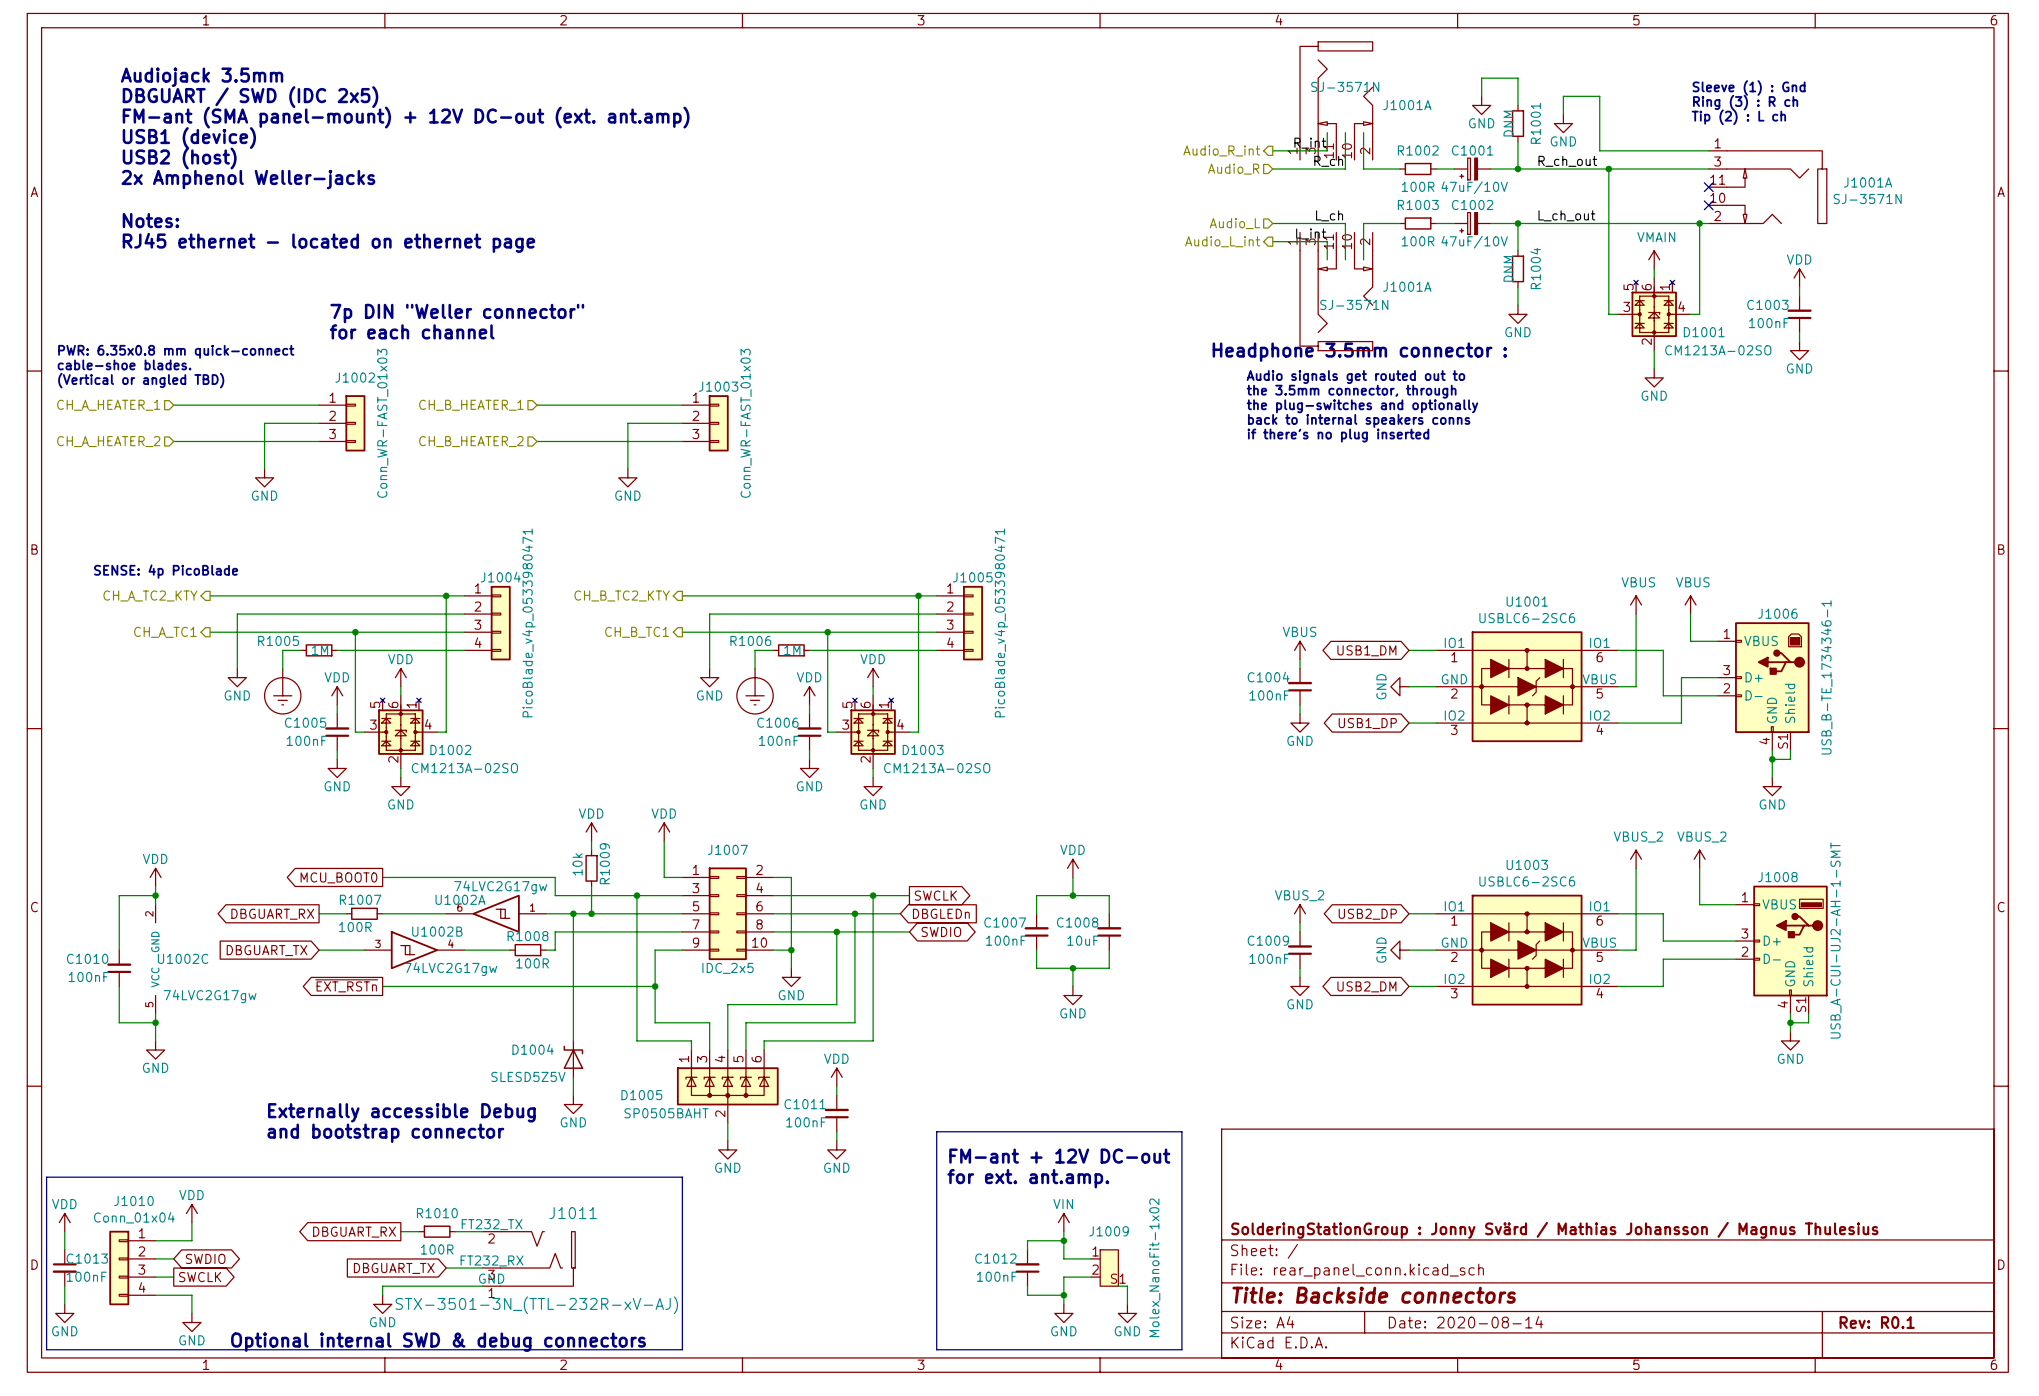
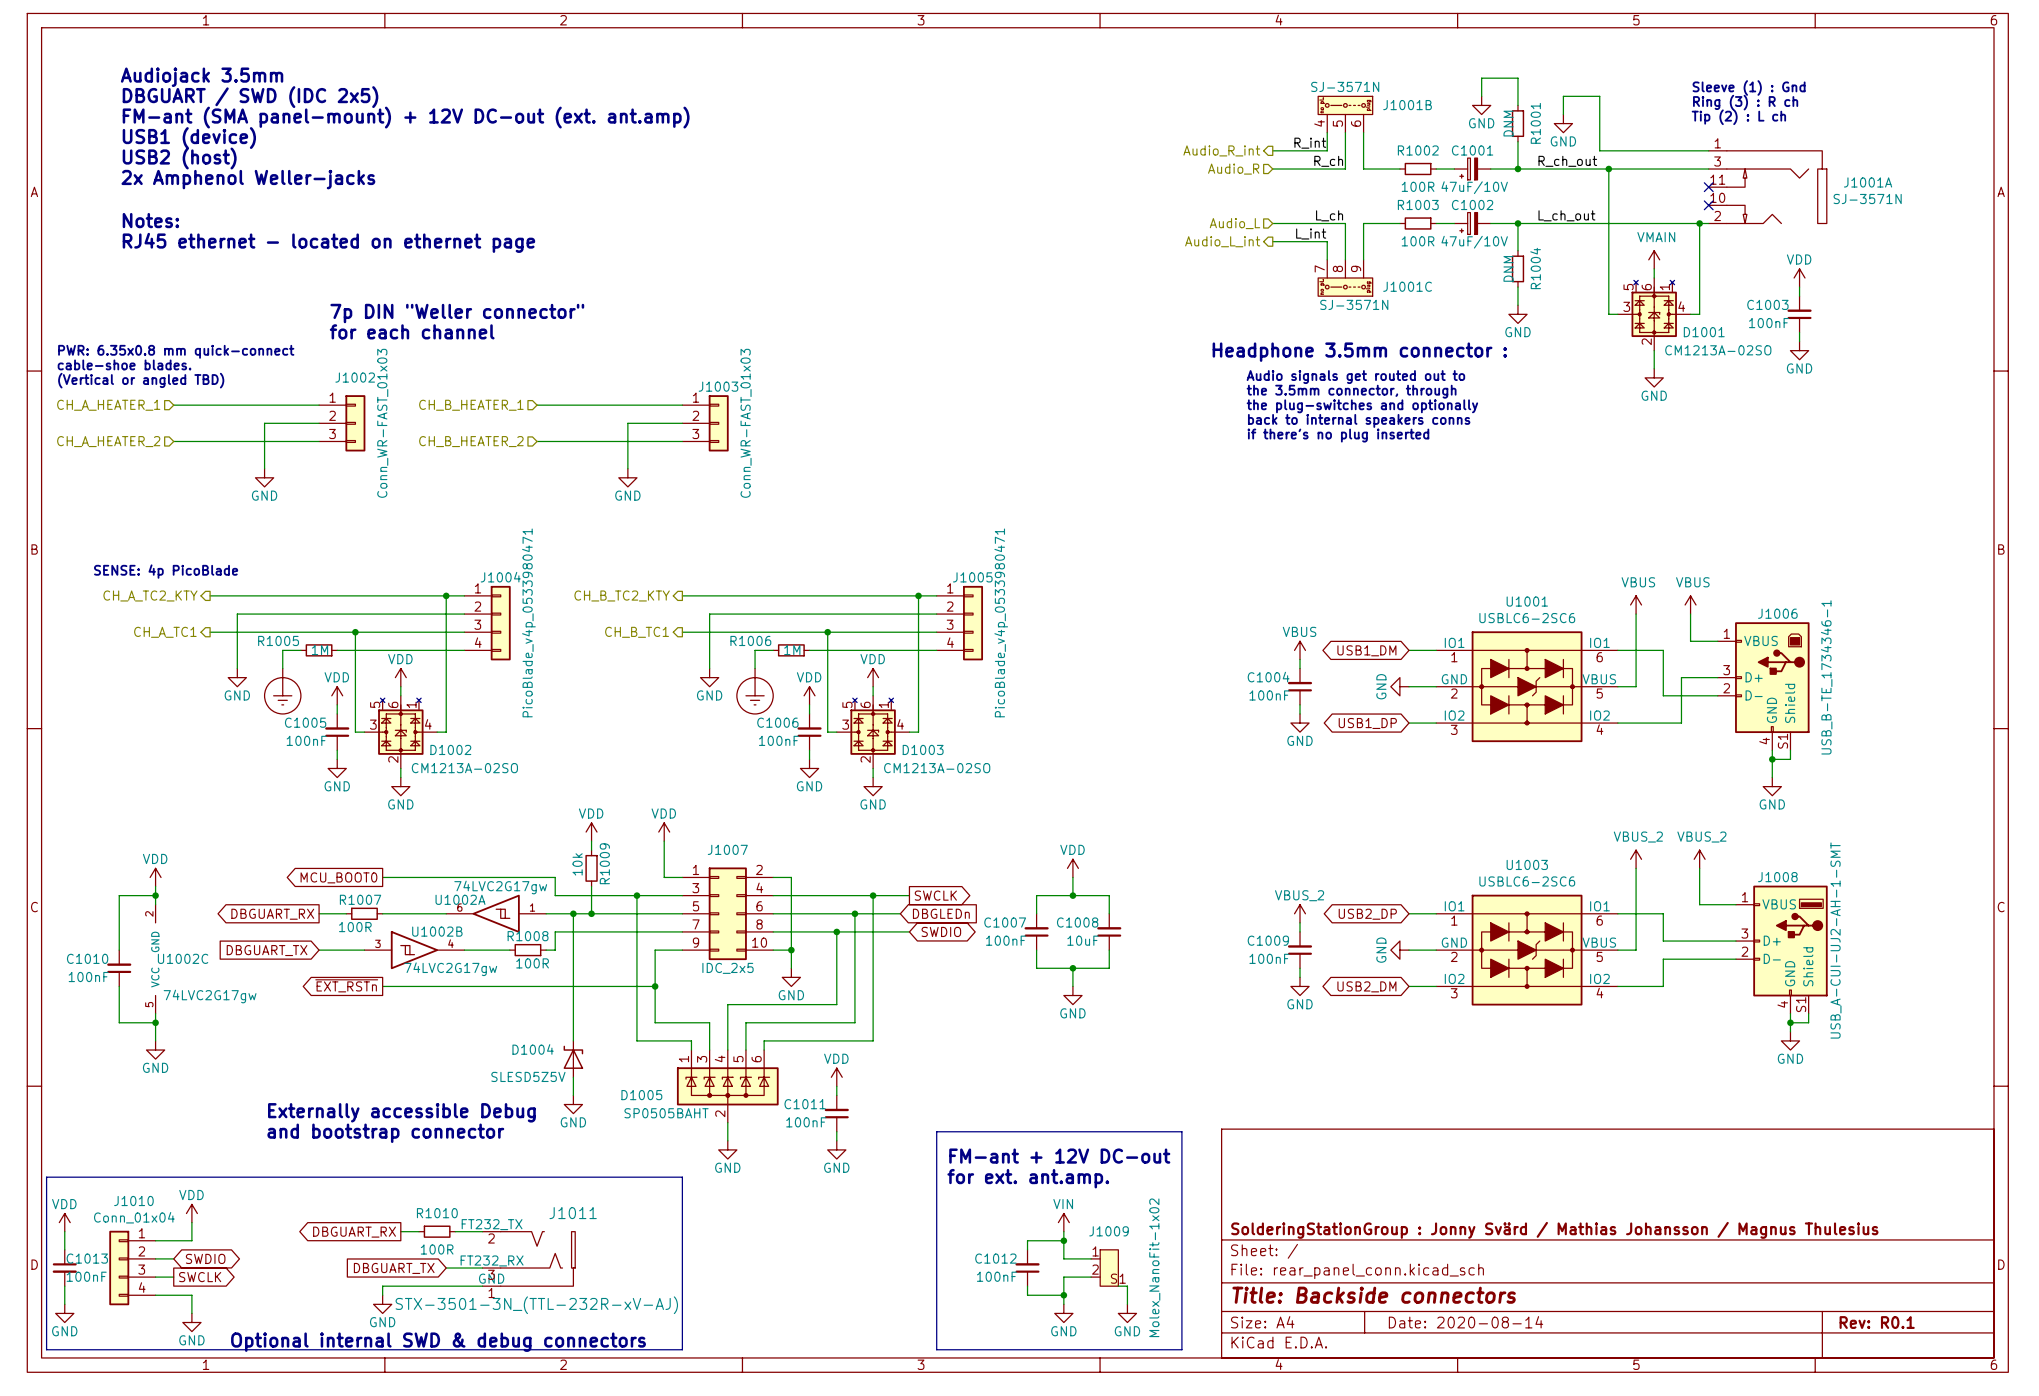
J1001A: SJ-3571N (1336, 100) -> none
J1001B: none -> SJ-3571N (1345, 114)
J1001C: none -> SJ-3571N (1345, 277)
J1001A: SJ-3571N (1336, 291) -> none

